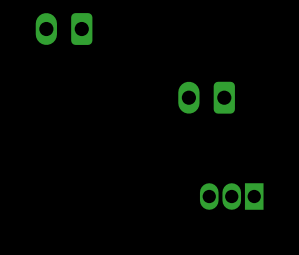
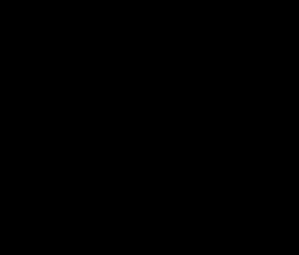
part: (64, 29) -> none
part: (206, 97) -> none
part: (231, 196) -> none

